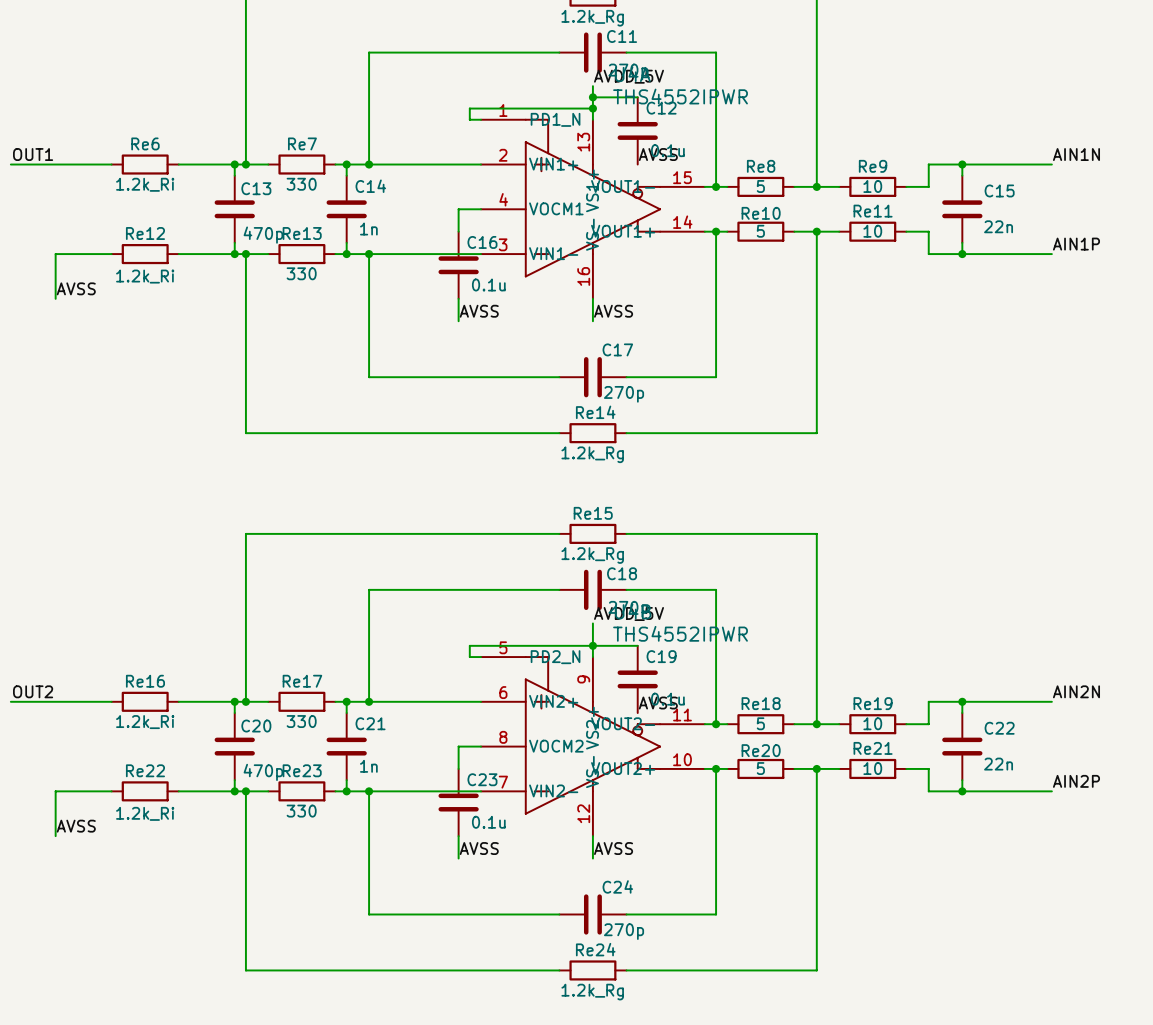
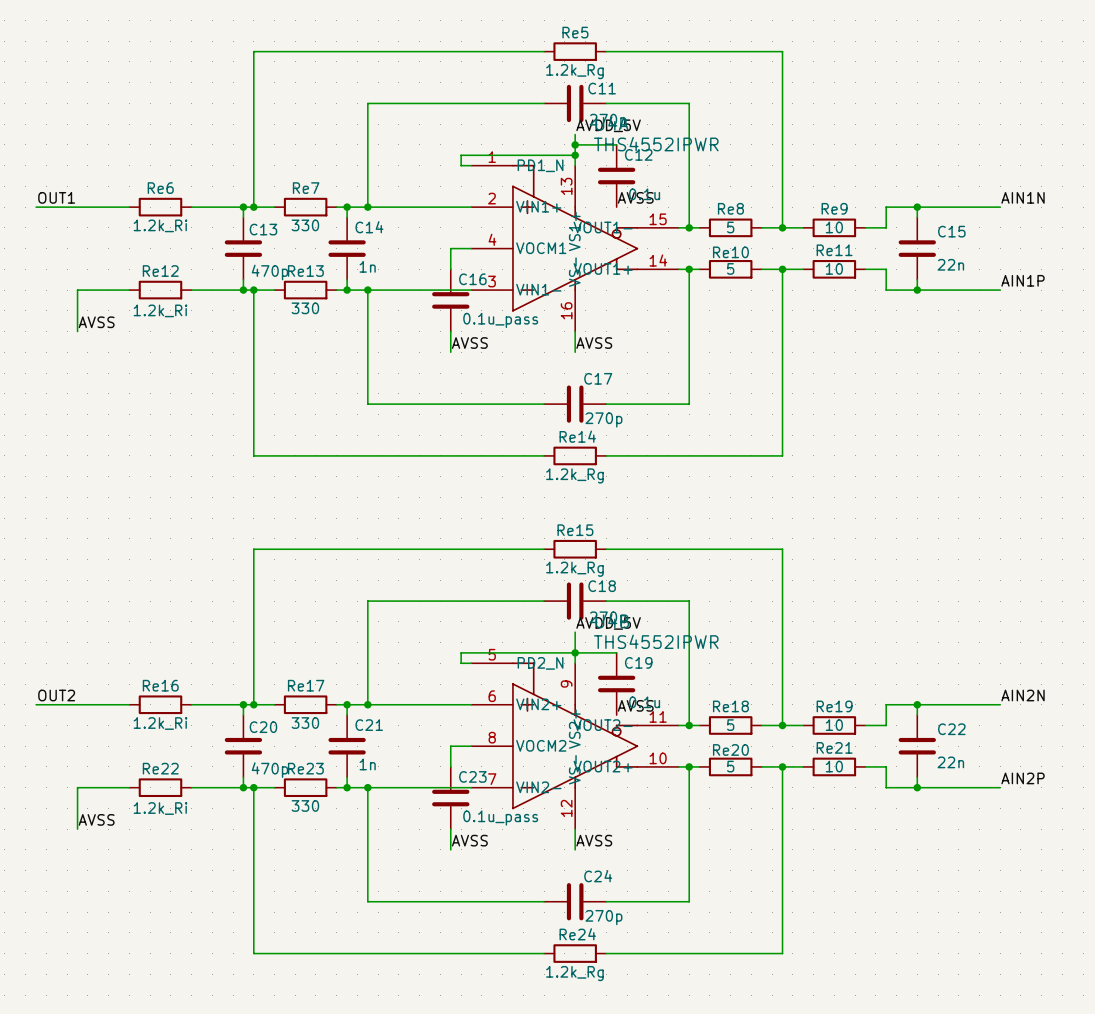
C16 value: 0.1u (488, 284) -> 0.1u_pass (500, 320)
C23 value: 0.1u (488, 822) -> 0.1u_pass (500, 818)

